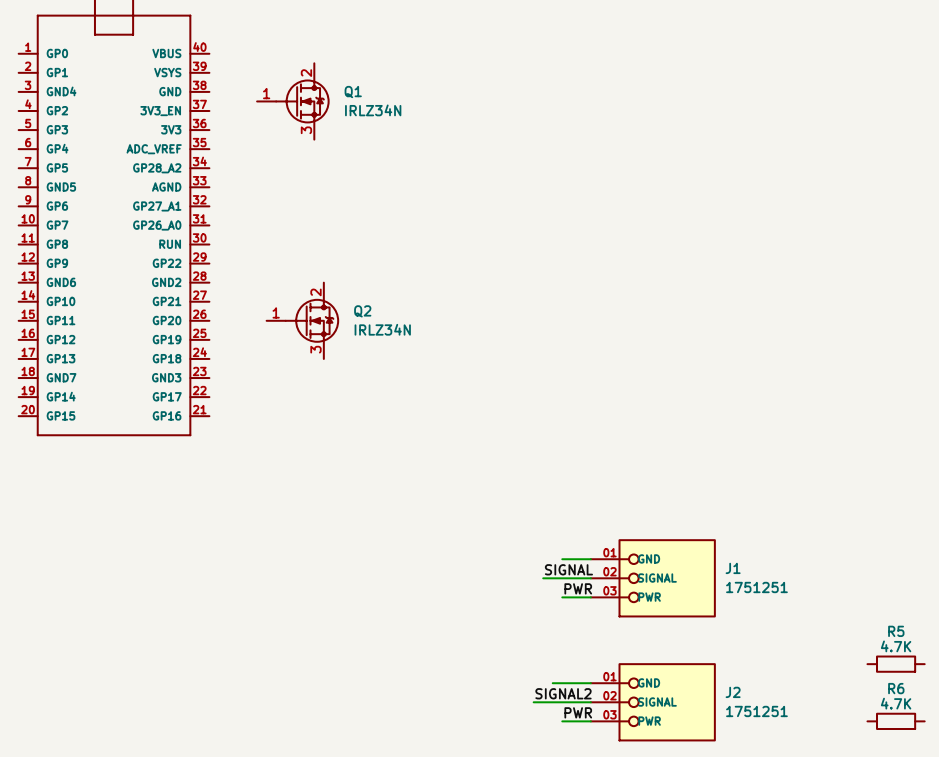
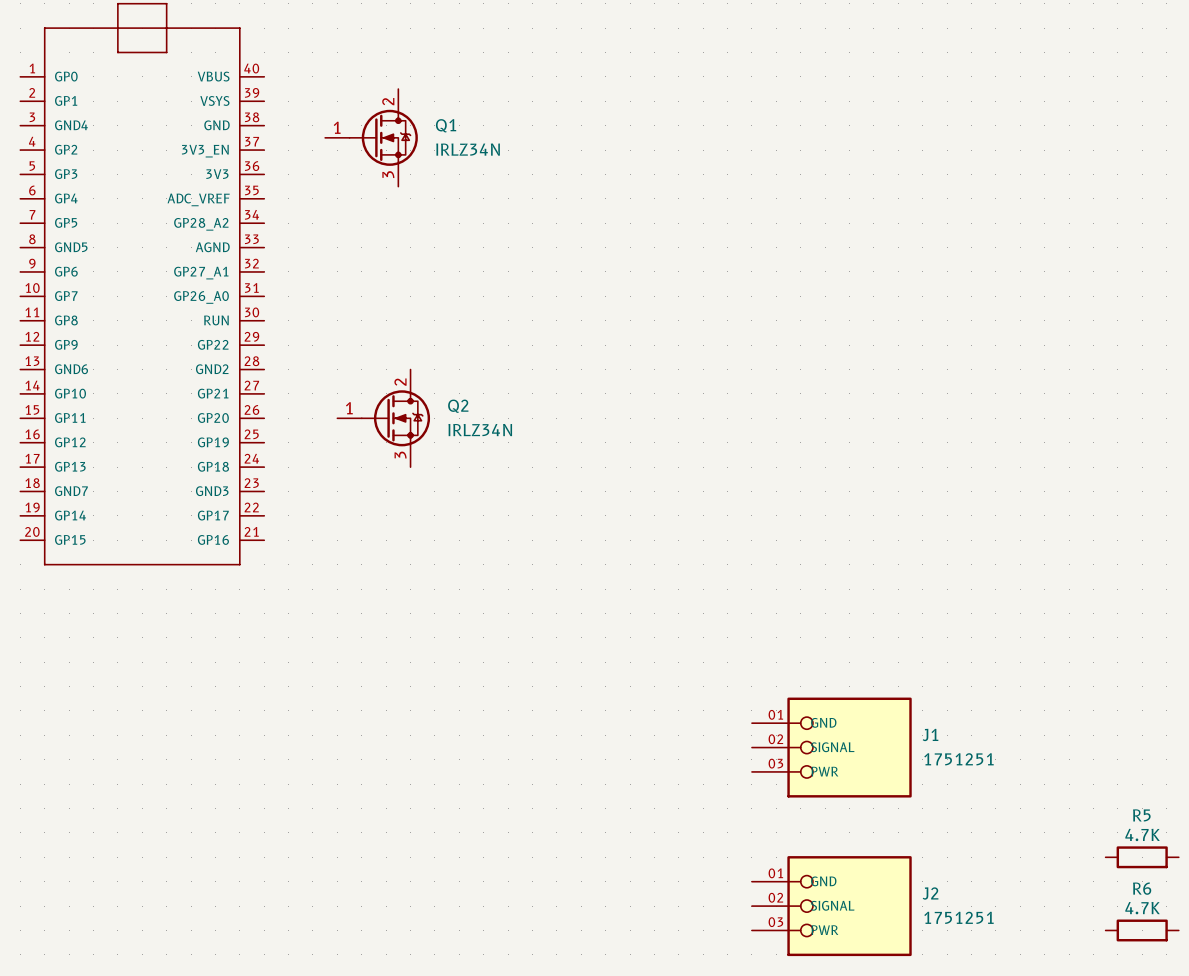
wire: (562, 559) (590, 559) -> none
label: SIGNAL (568, 569) -> none
wire: (543, 578) (590, 578) -> none
label: PWR (578, 588) -> none
wire: (562, 597) (590, 597) -> none
wire: (552, 683) (590, 683) -> none
label: SIGNAL2 (563, 693) -> none
wire: (533, 702) (590, 702) -> none
label: PWR (578, 712) -> none
wire: (562, 721) (590, 721) -> none

